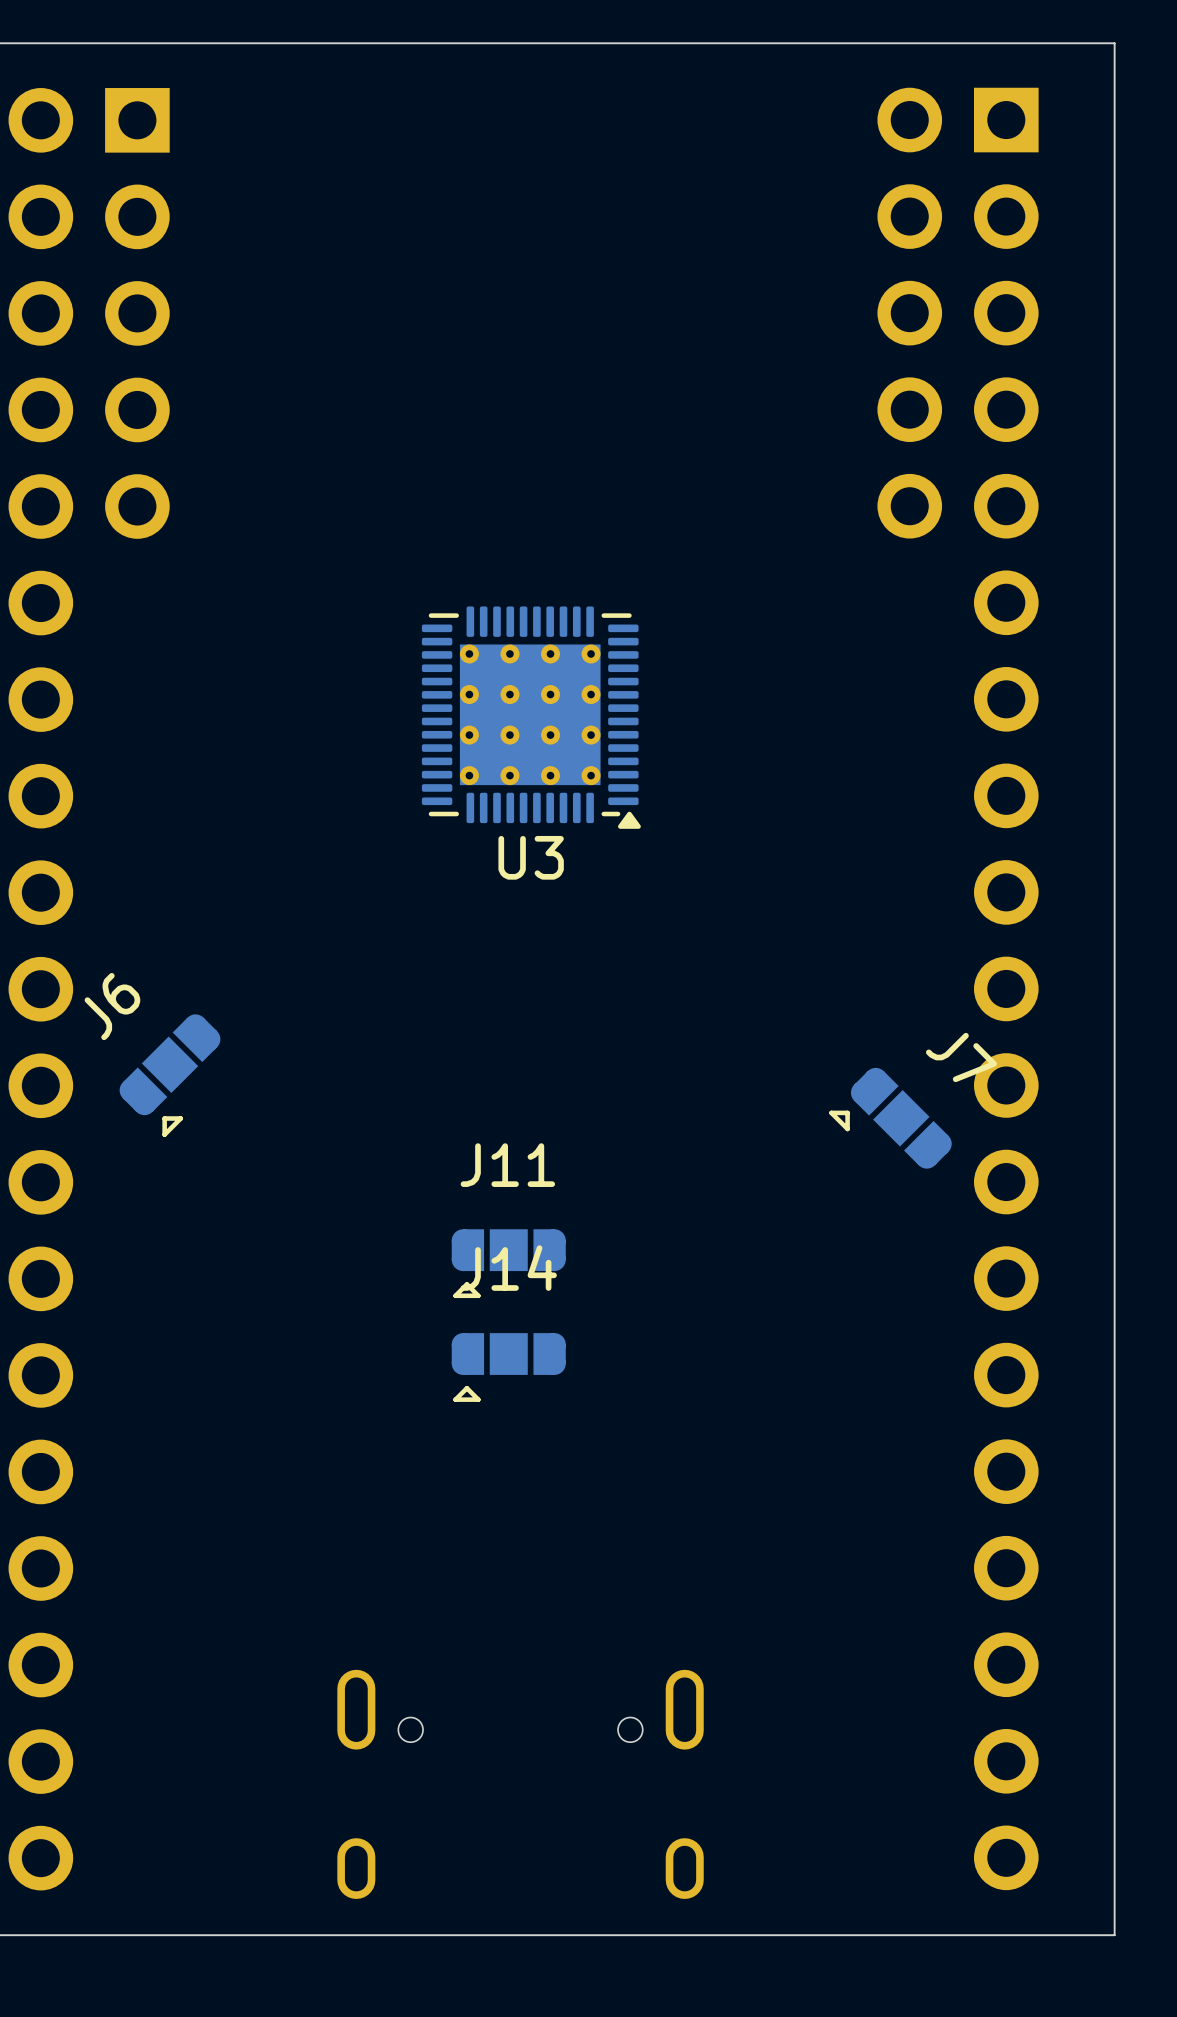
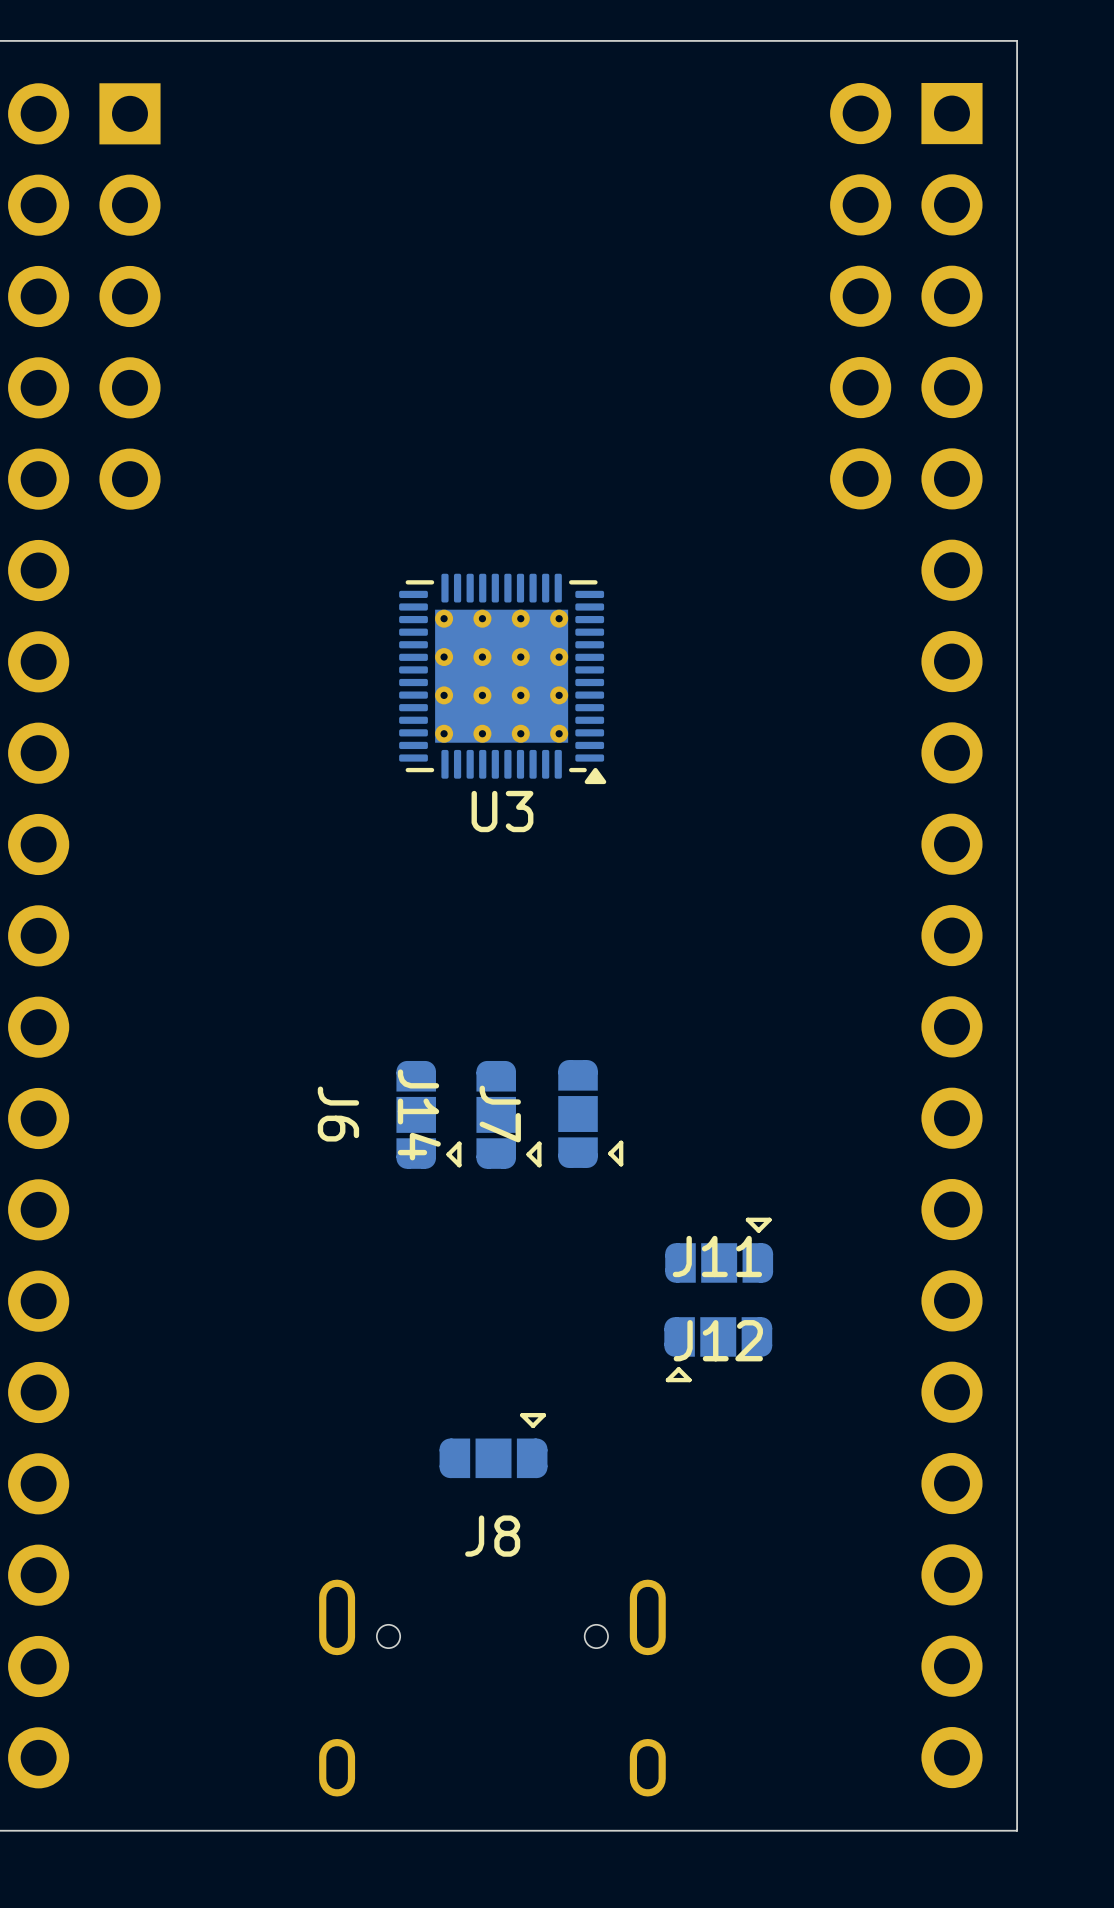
board edge: (1075, 43) (1114, 43) (1114, 1935) (1075, 1935) -> (1017, 40) (1017, 1830)
J6 rotation: 0° (170, 1075) -> 45° counterclockwise (428, 1114)
J6 position: (170, 1075) -> (428, 1114)
J7 rotation: 0° (890, 1118) -> 135° counterclockwise (590, 1114)
J7 position: (890, 1118) -> (590, 1114)
J11 position: (508, 1263) -> (718, 1349)
J12: none -> (719, 1250)
J14 rotation: 0° (508, 1367) -> 90° counterclockwise (508, 1114)
J14 position: (508, 1367) -> (508, 1114)
J8: none -> (493, 1445)

